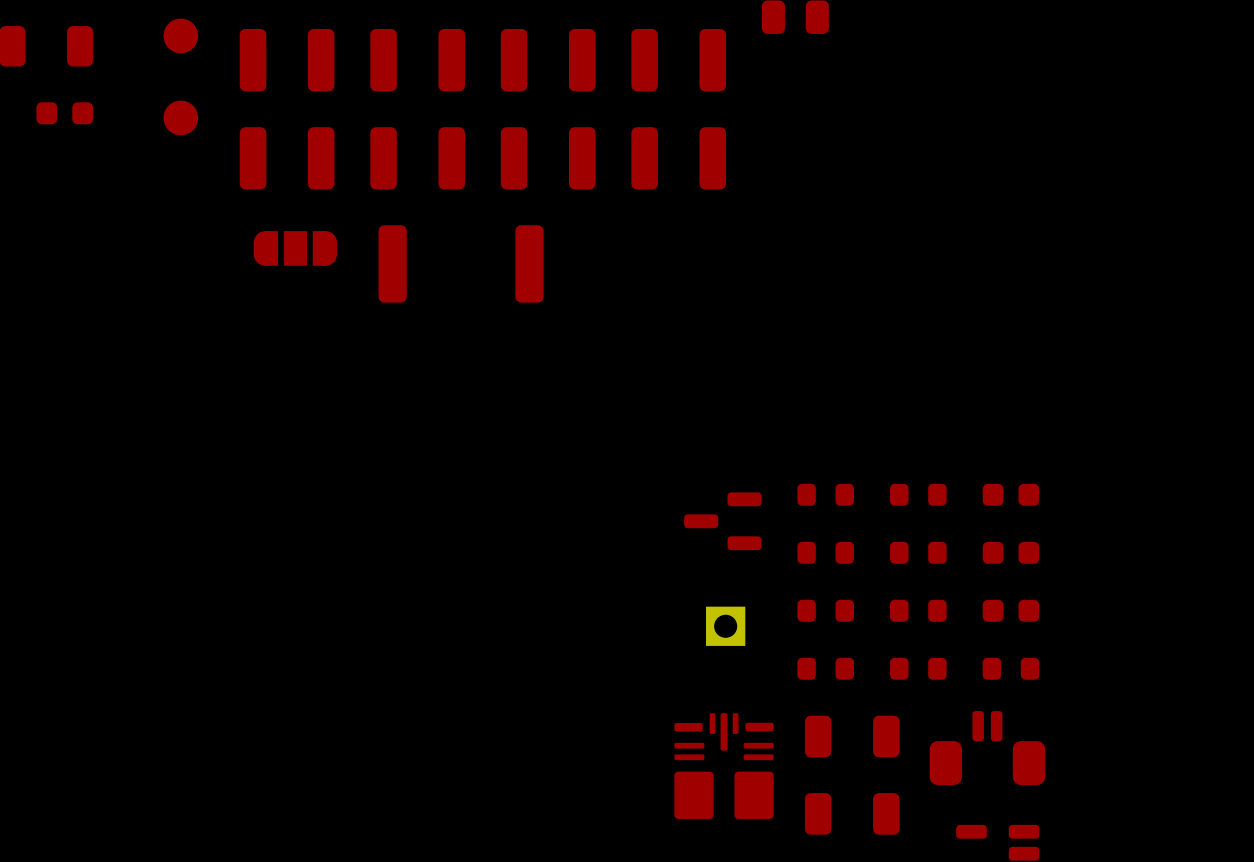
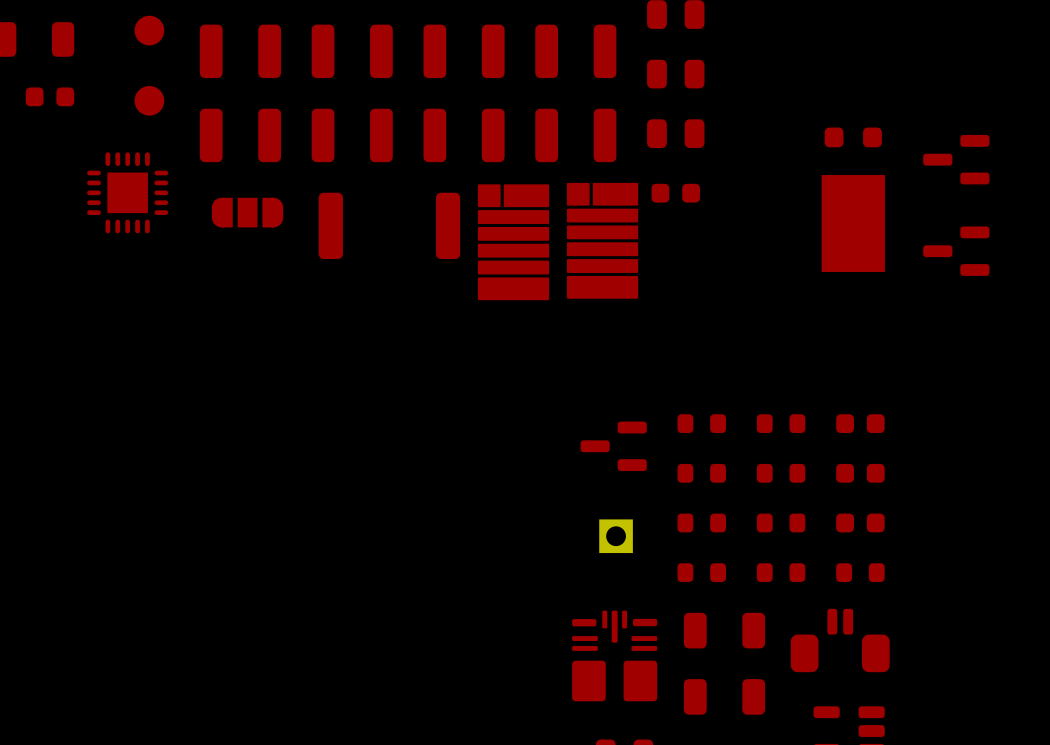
part: none -> (675, 74)
part: none -> (675, 133)
part: none -> (956, 159)
part: none -> (127, 192)
part: none -> (675, 193)
part: none -> (853, 199)
part: none -> (602, 240)
part: none -> (513, 242)
part: none -> (956, 251)

